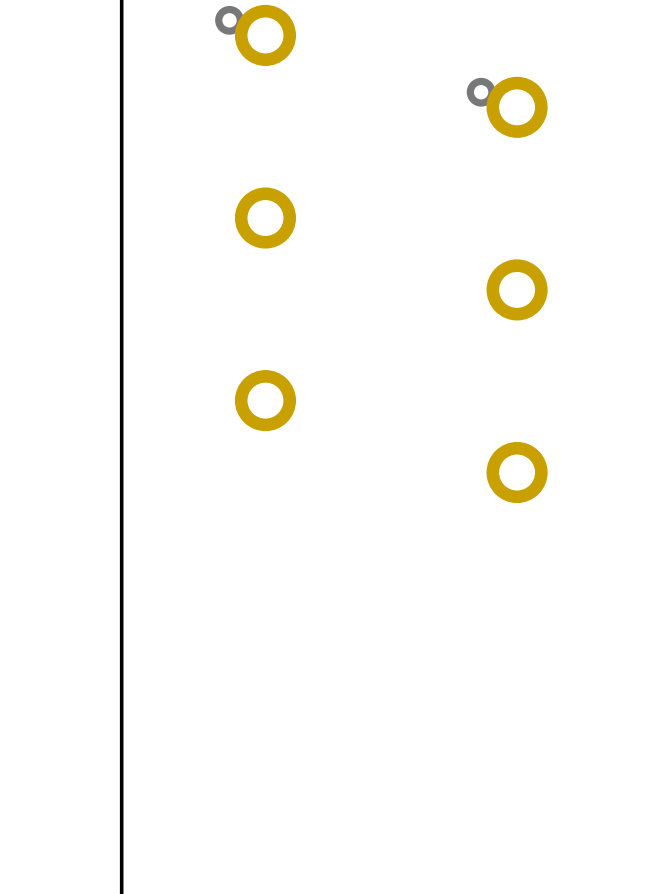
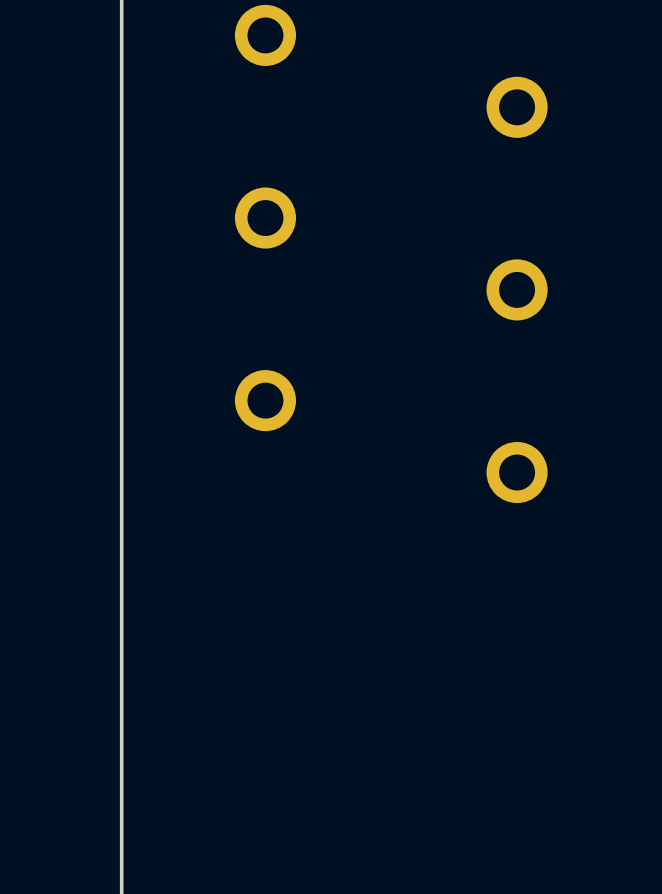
via: (229, 20) -> none
via: (481, 92) -> none

